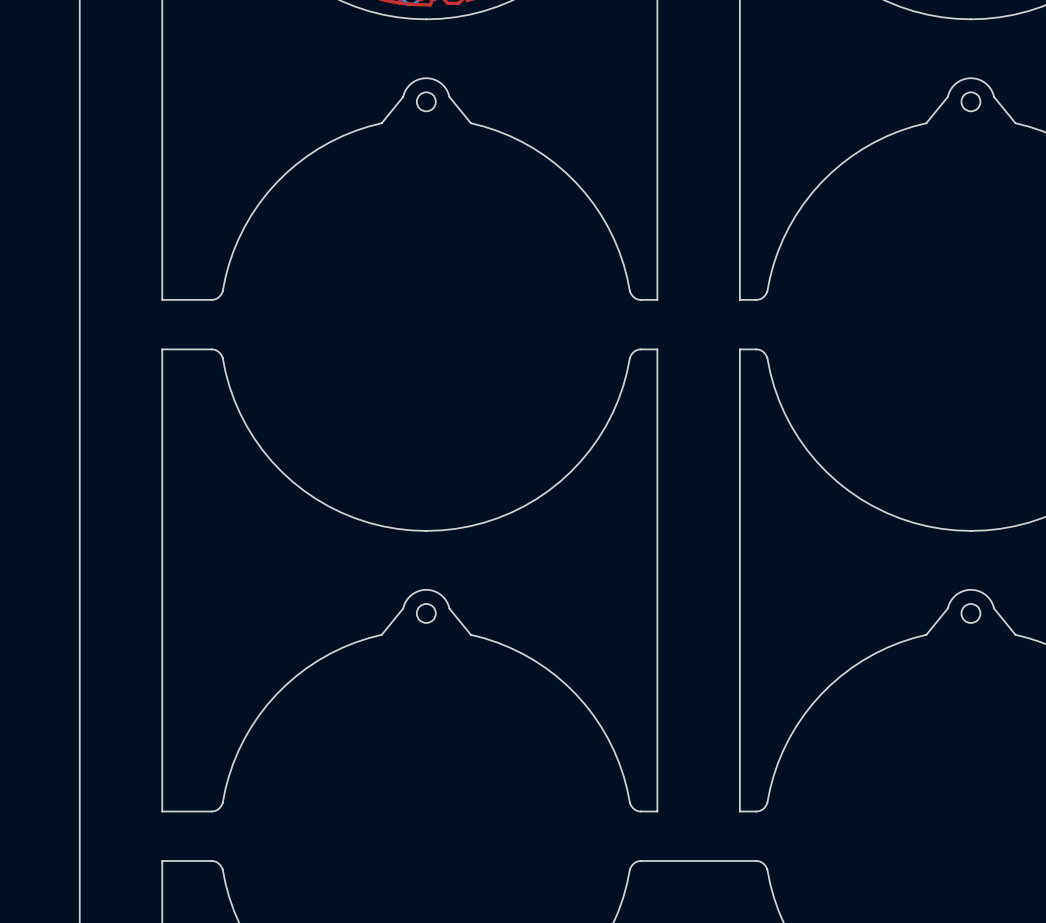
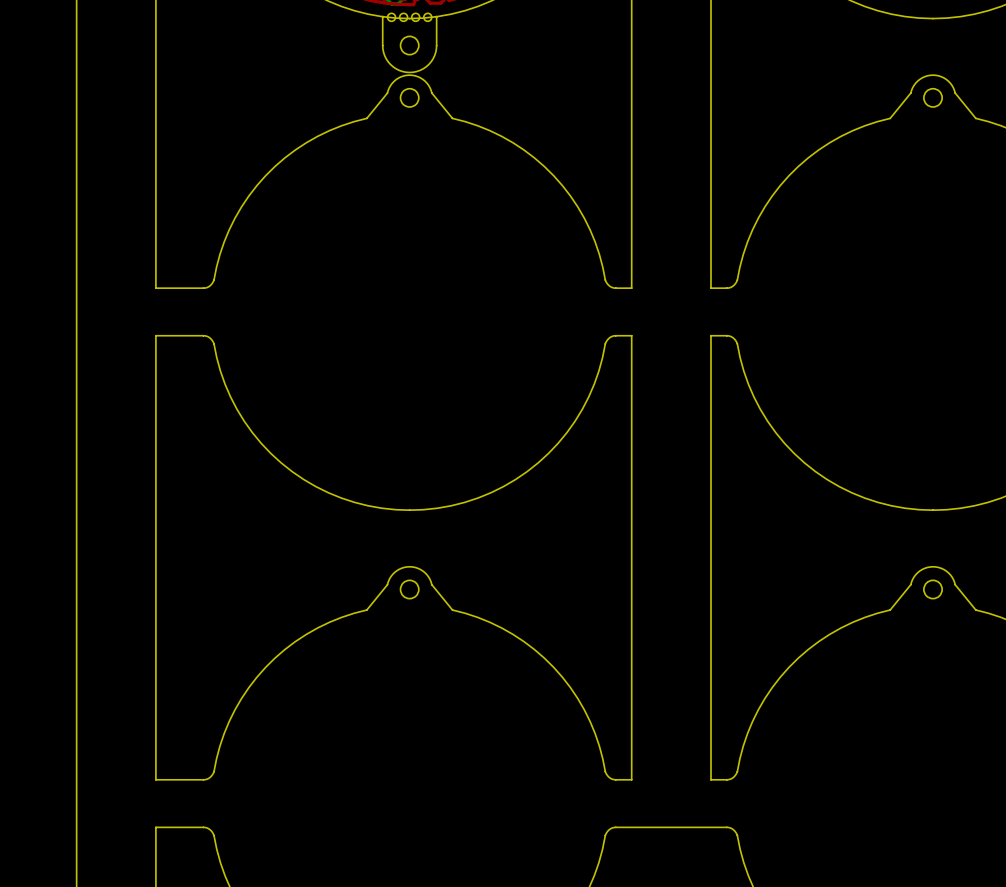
part: none -> (409, 43)

